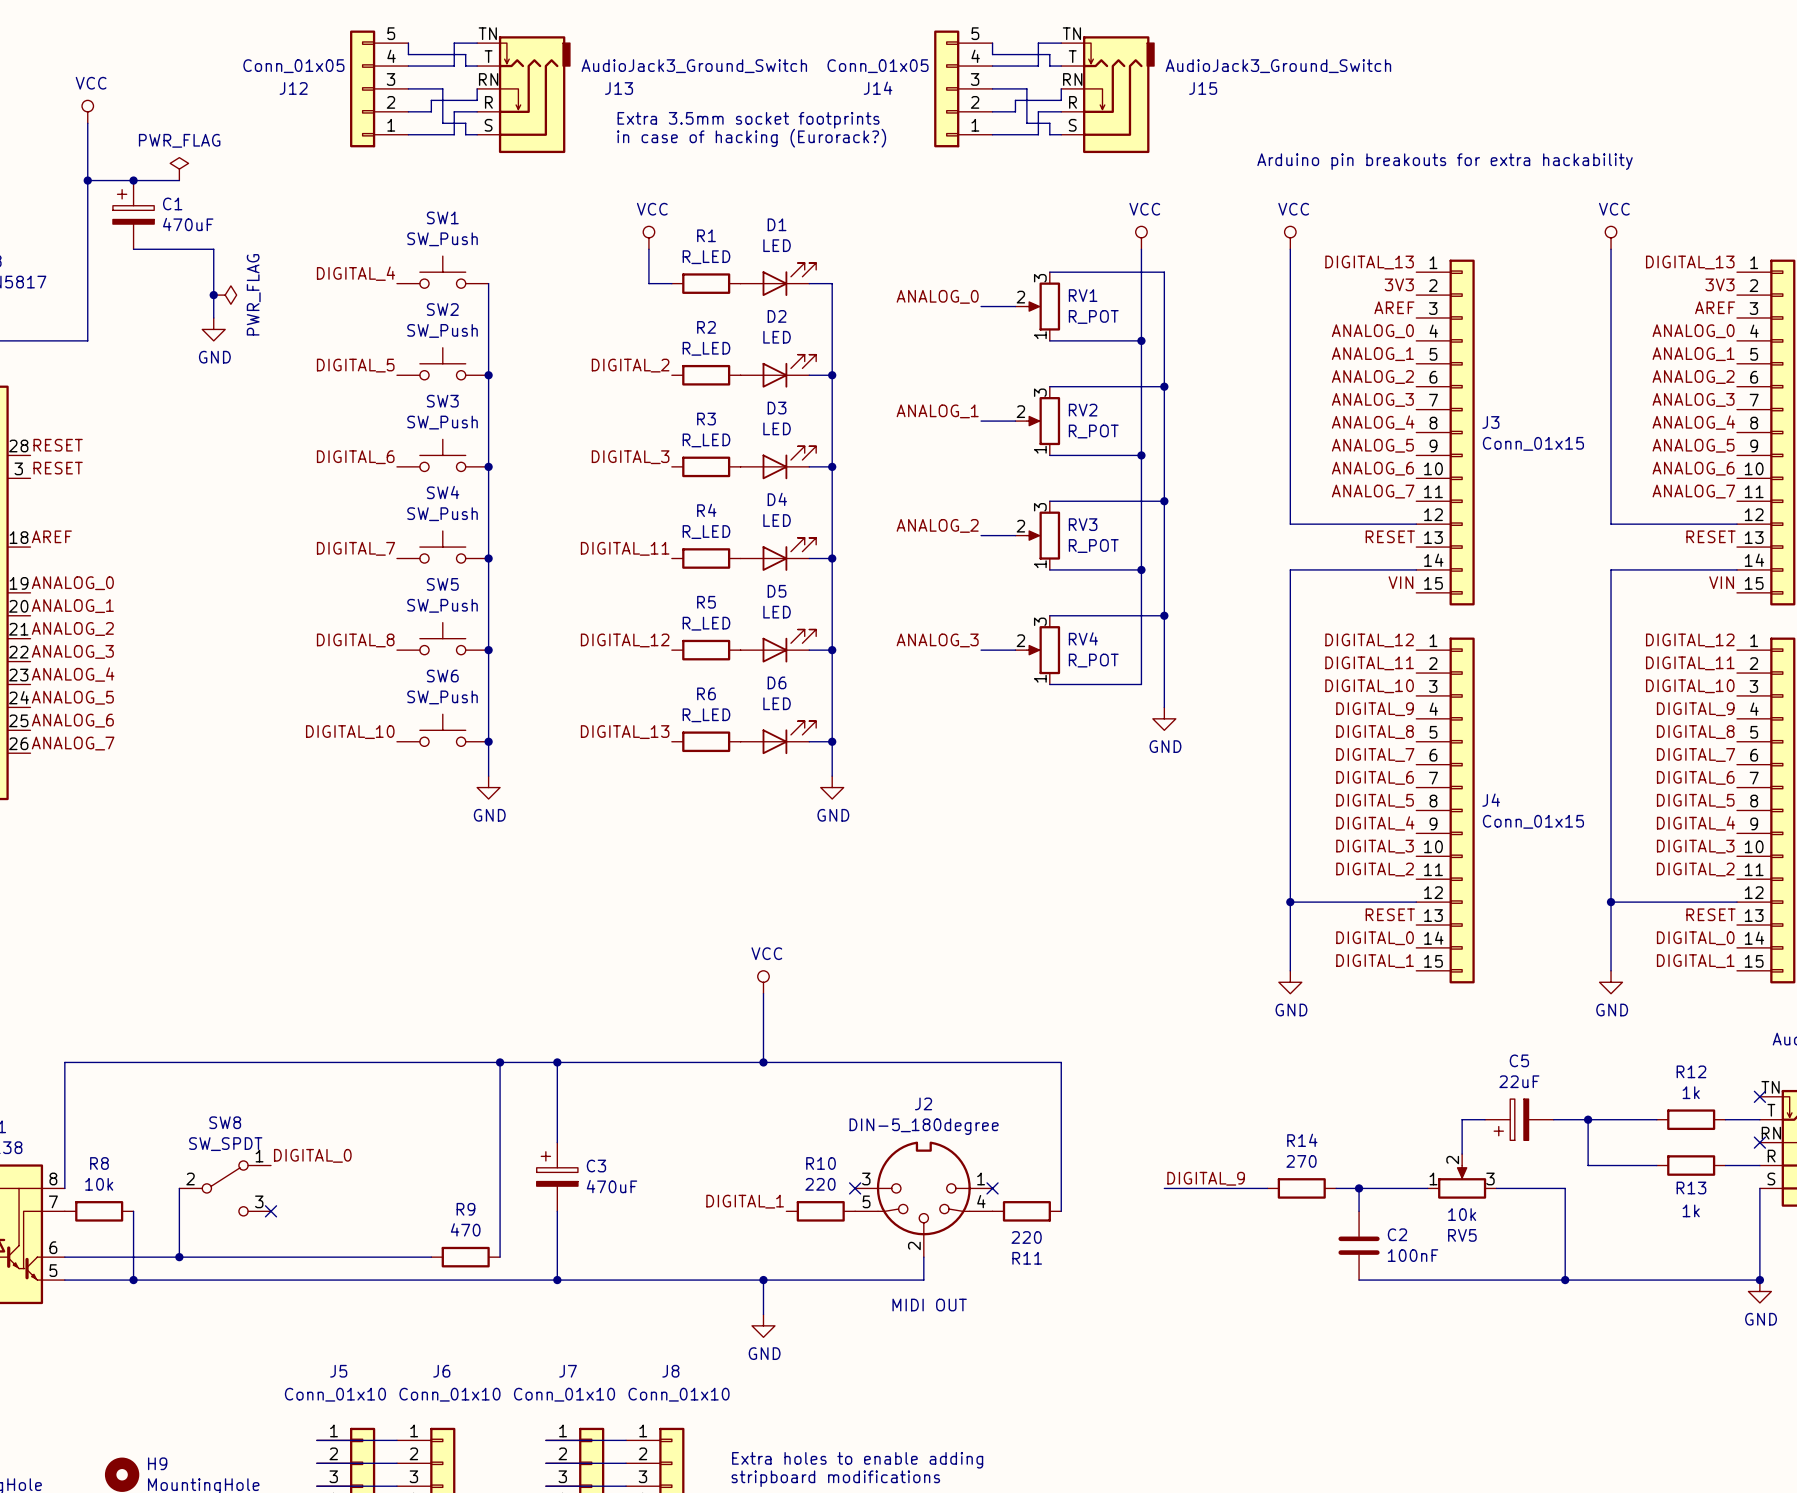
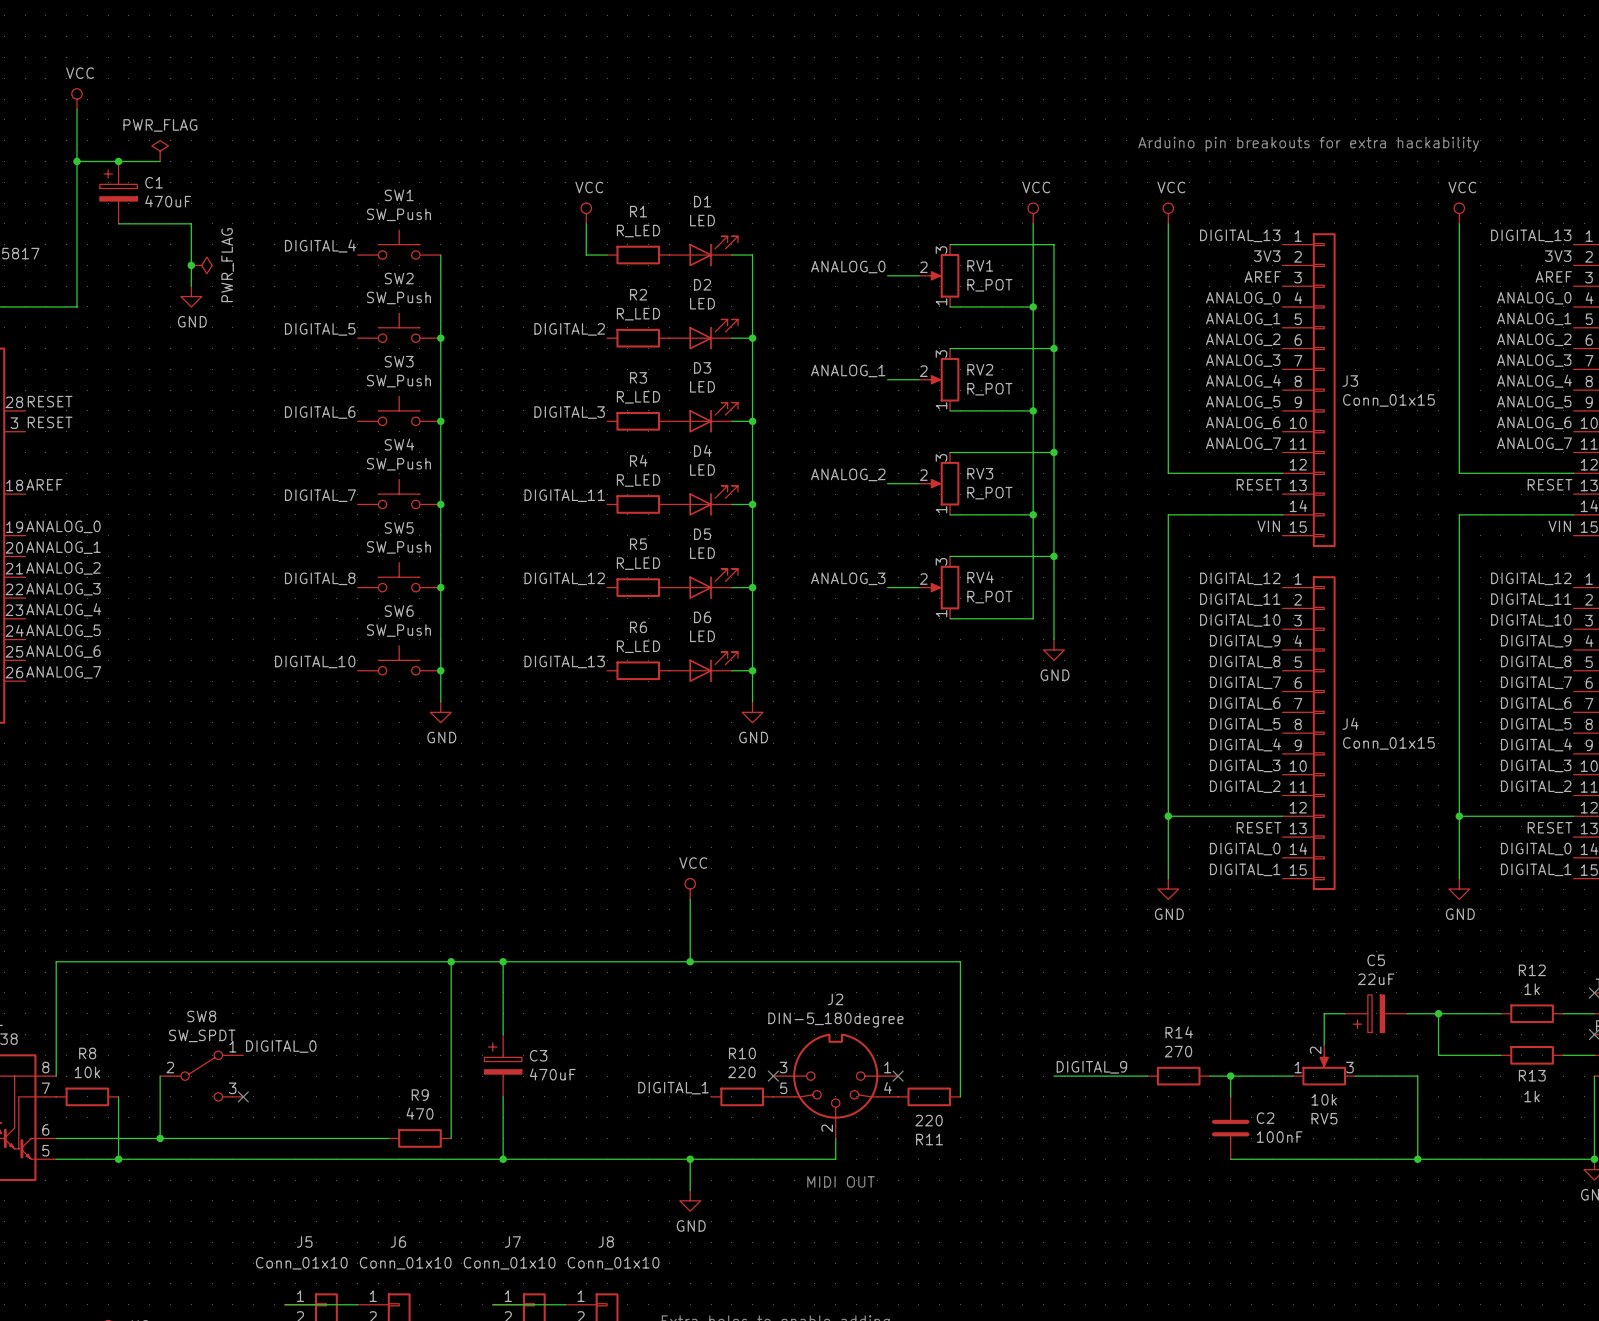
wire: (408, 43) (408, 54) (465, 54) (465, 66) (477, 66) -> none
wire: (477, 43) (454, 43) (454, 66) (408, 66) -> none
wire: (992, 43) (992, 54) (1049, 54) (1049, 66) (1061, 66) -> none
wire: (1061, 43) (1038, 43) (1038, 66) (992, 66) -> none
J12: Conn_01x05 (379, 88) -> none
wire: (408, 88) (442, 88) (442, 123) (465, 123) (465, 134) (477, 134) -> none
wire: (477, 88) (477, 100) (431, 100) (431, 111) (408, 111) -> none
J14: Conn_01x05 (963, 88) -> none
wire: (992, 88) (1026, 88) (1026, 123) (1049, 123) (1049, 134) (1061, 134) -> none
wire: (1061, 88) (1061, 100) (1015, 100) (1015, 111) (992, 111) -> none
J13: AudioJack3_Ground_Switch (523, 94) -> none
J15: AudioJack3_Ground_Switch (1107, 94) -> none
wire: (477, 111) (454, 111) (454, 134) (408, 134) -> none
wire: (1061, 111) (1038, 111) (1038, 134) (992, 134) -> none
text: Extra 3.5mm socket footprints (748, 120) -> none
text: in case of hacking (Eurorack?) (751, 138) -> none

